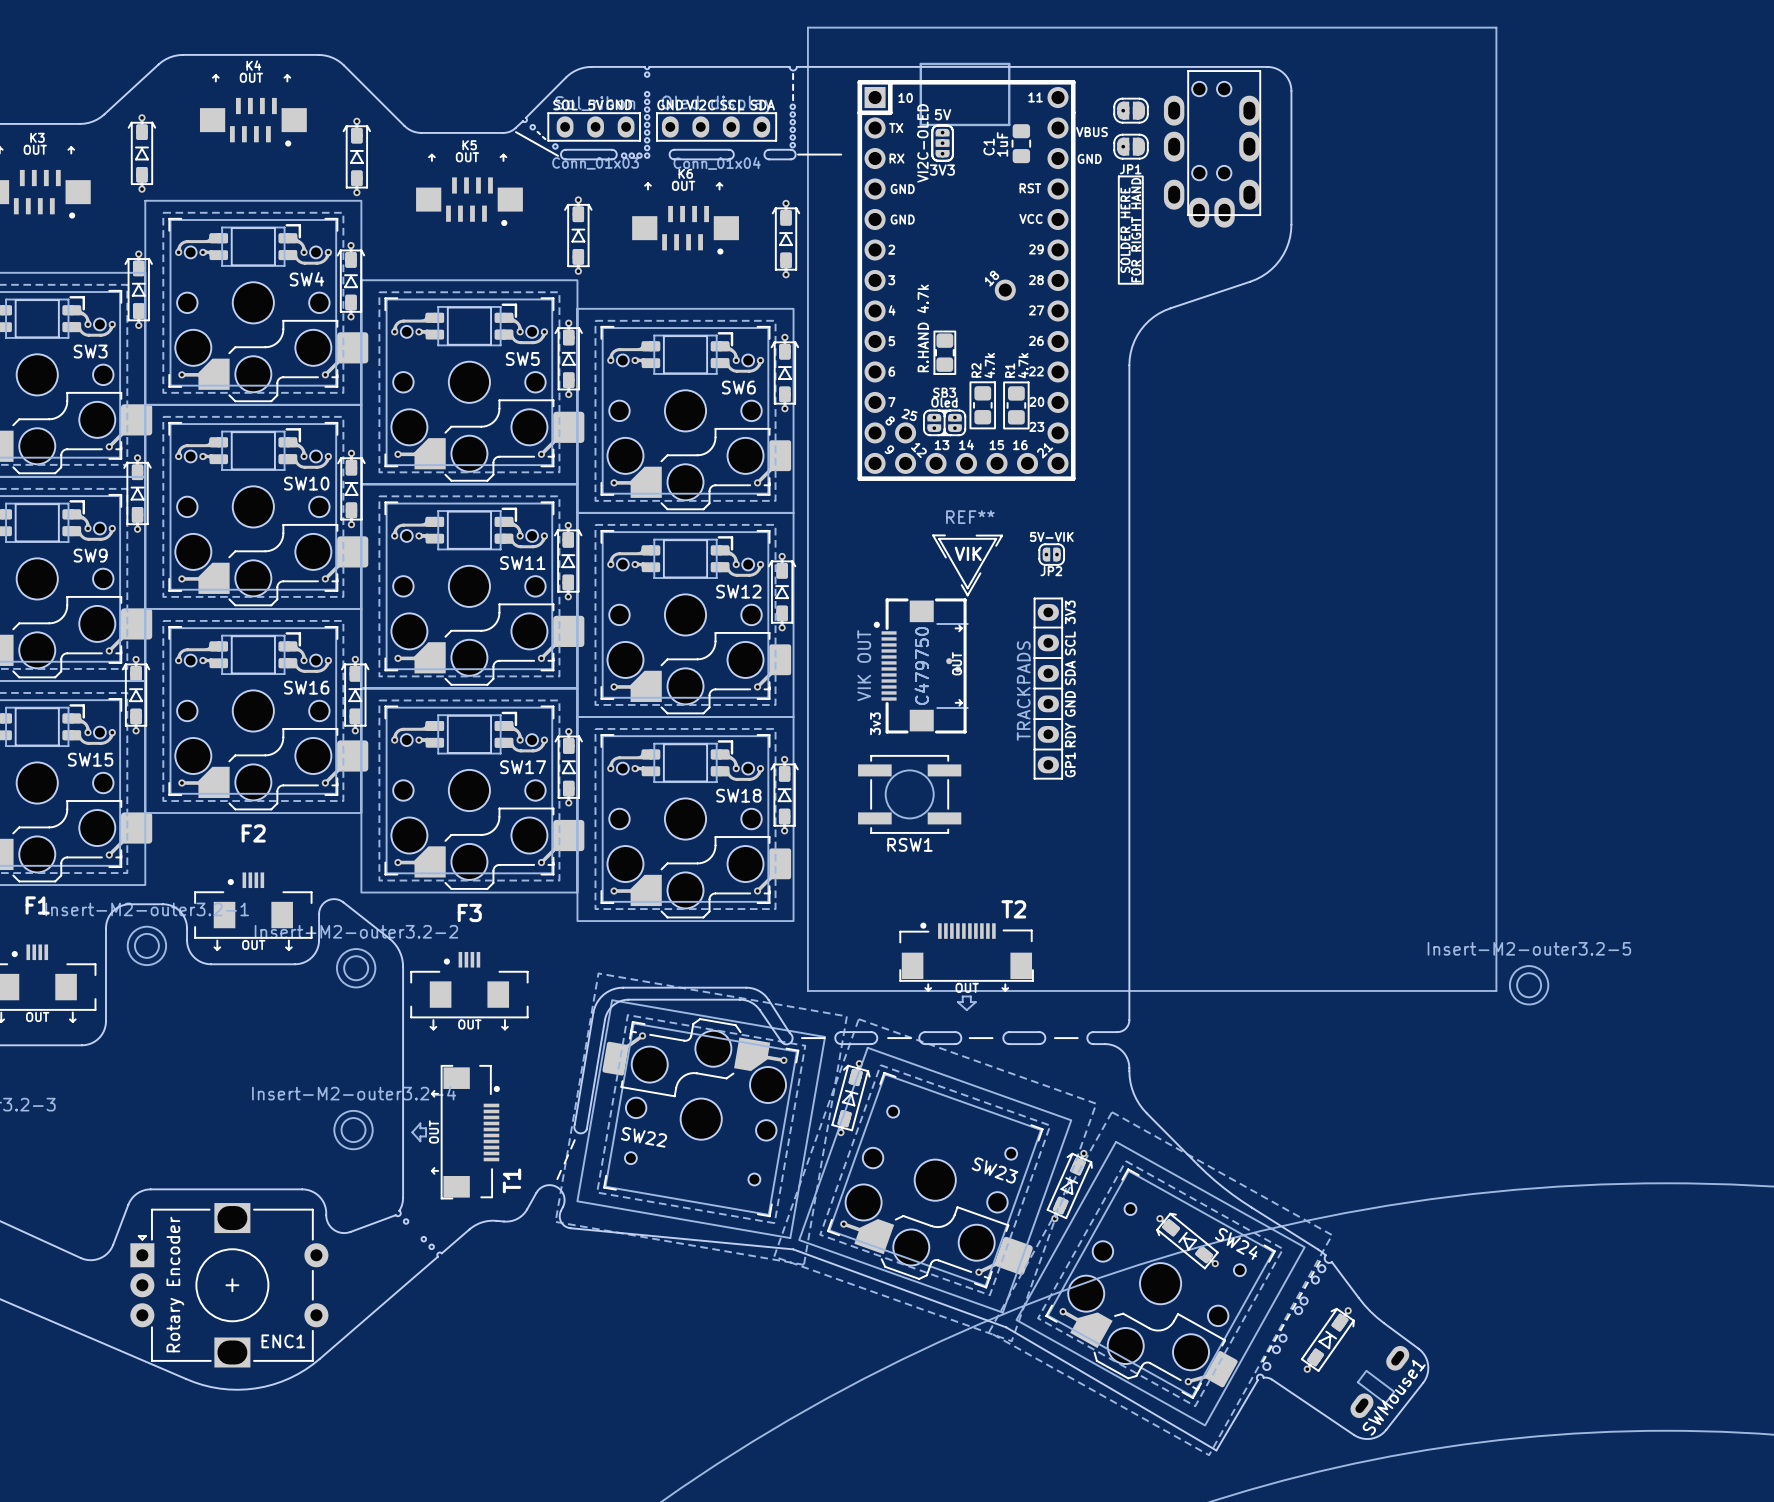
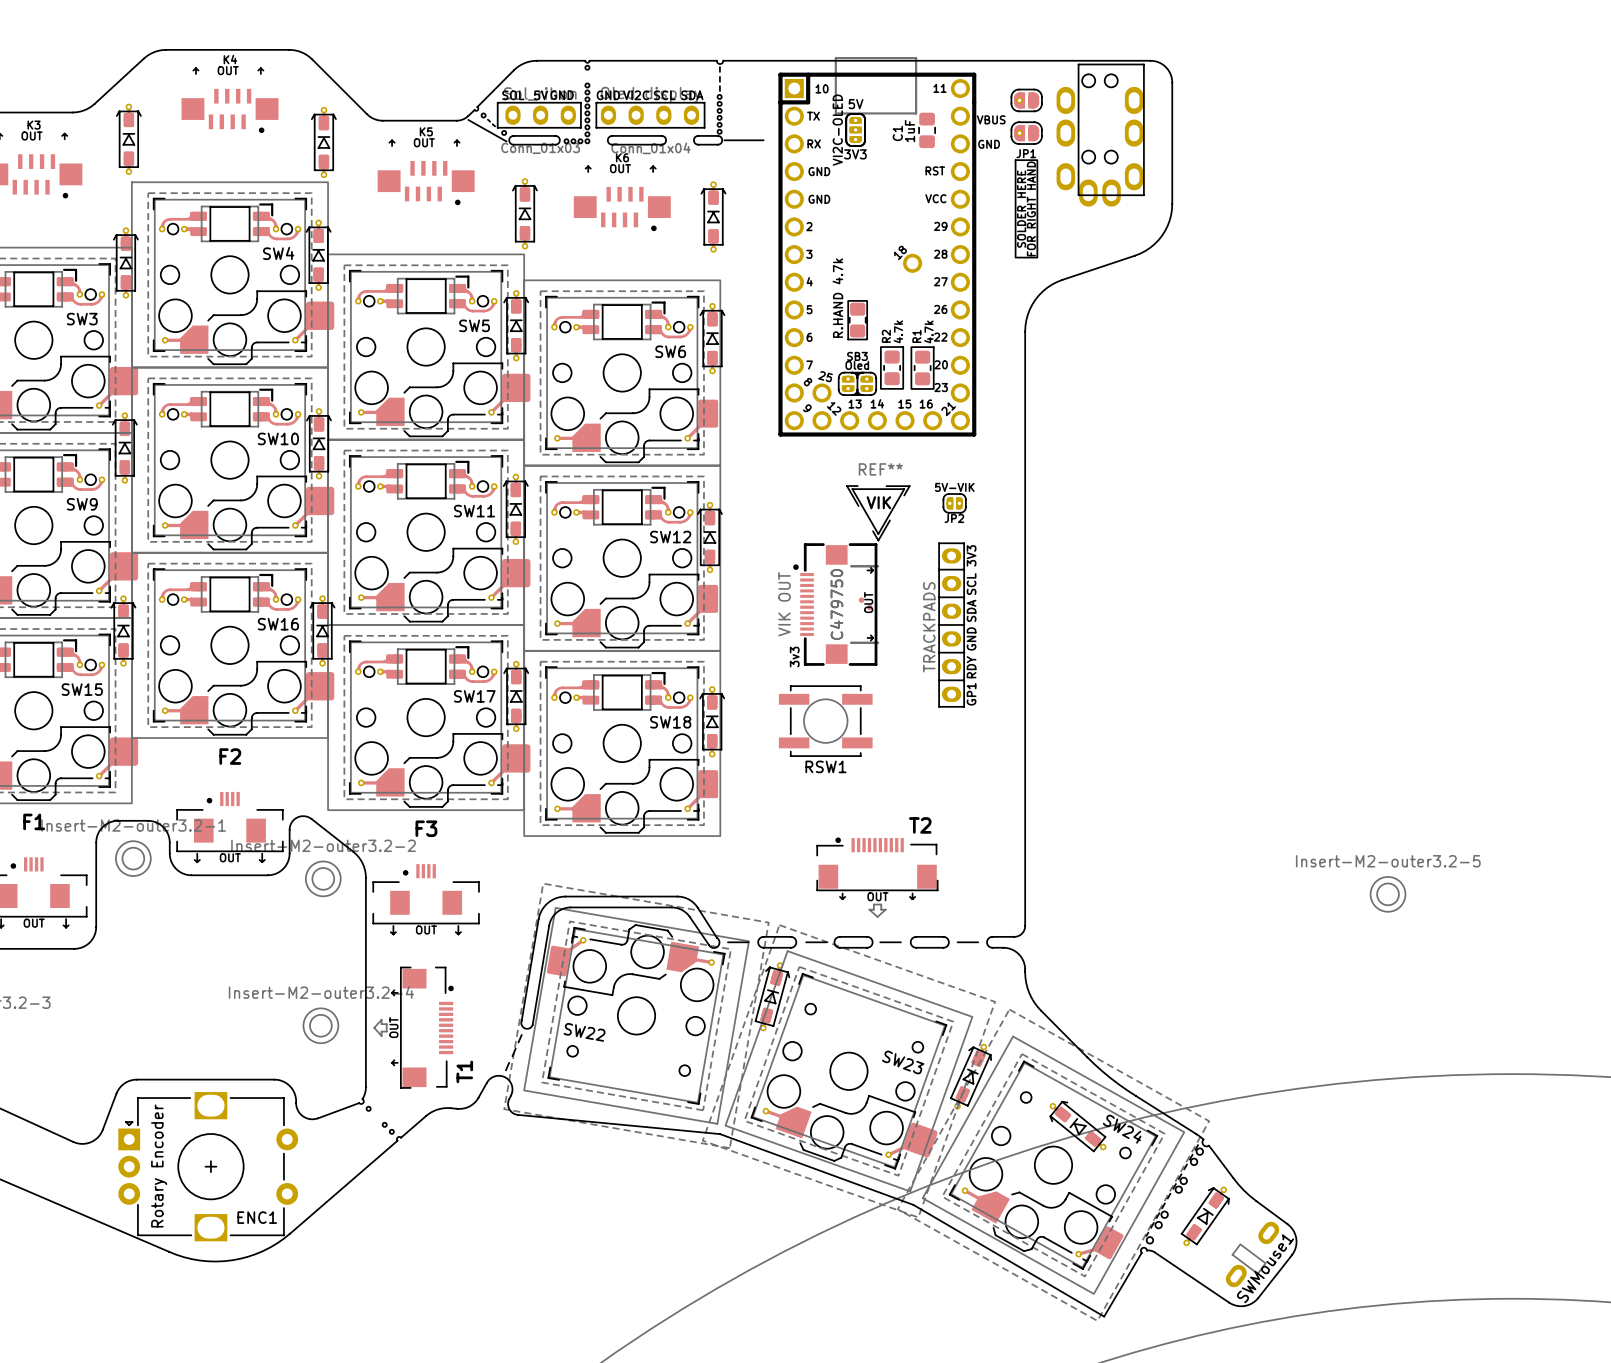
line: (807, 27) (1496, 27) (1496, 990) (807, 990) (807, 27) -> none

